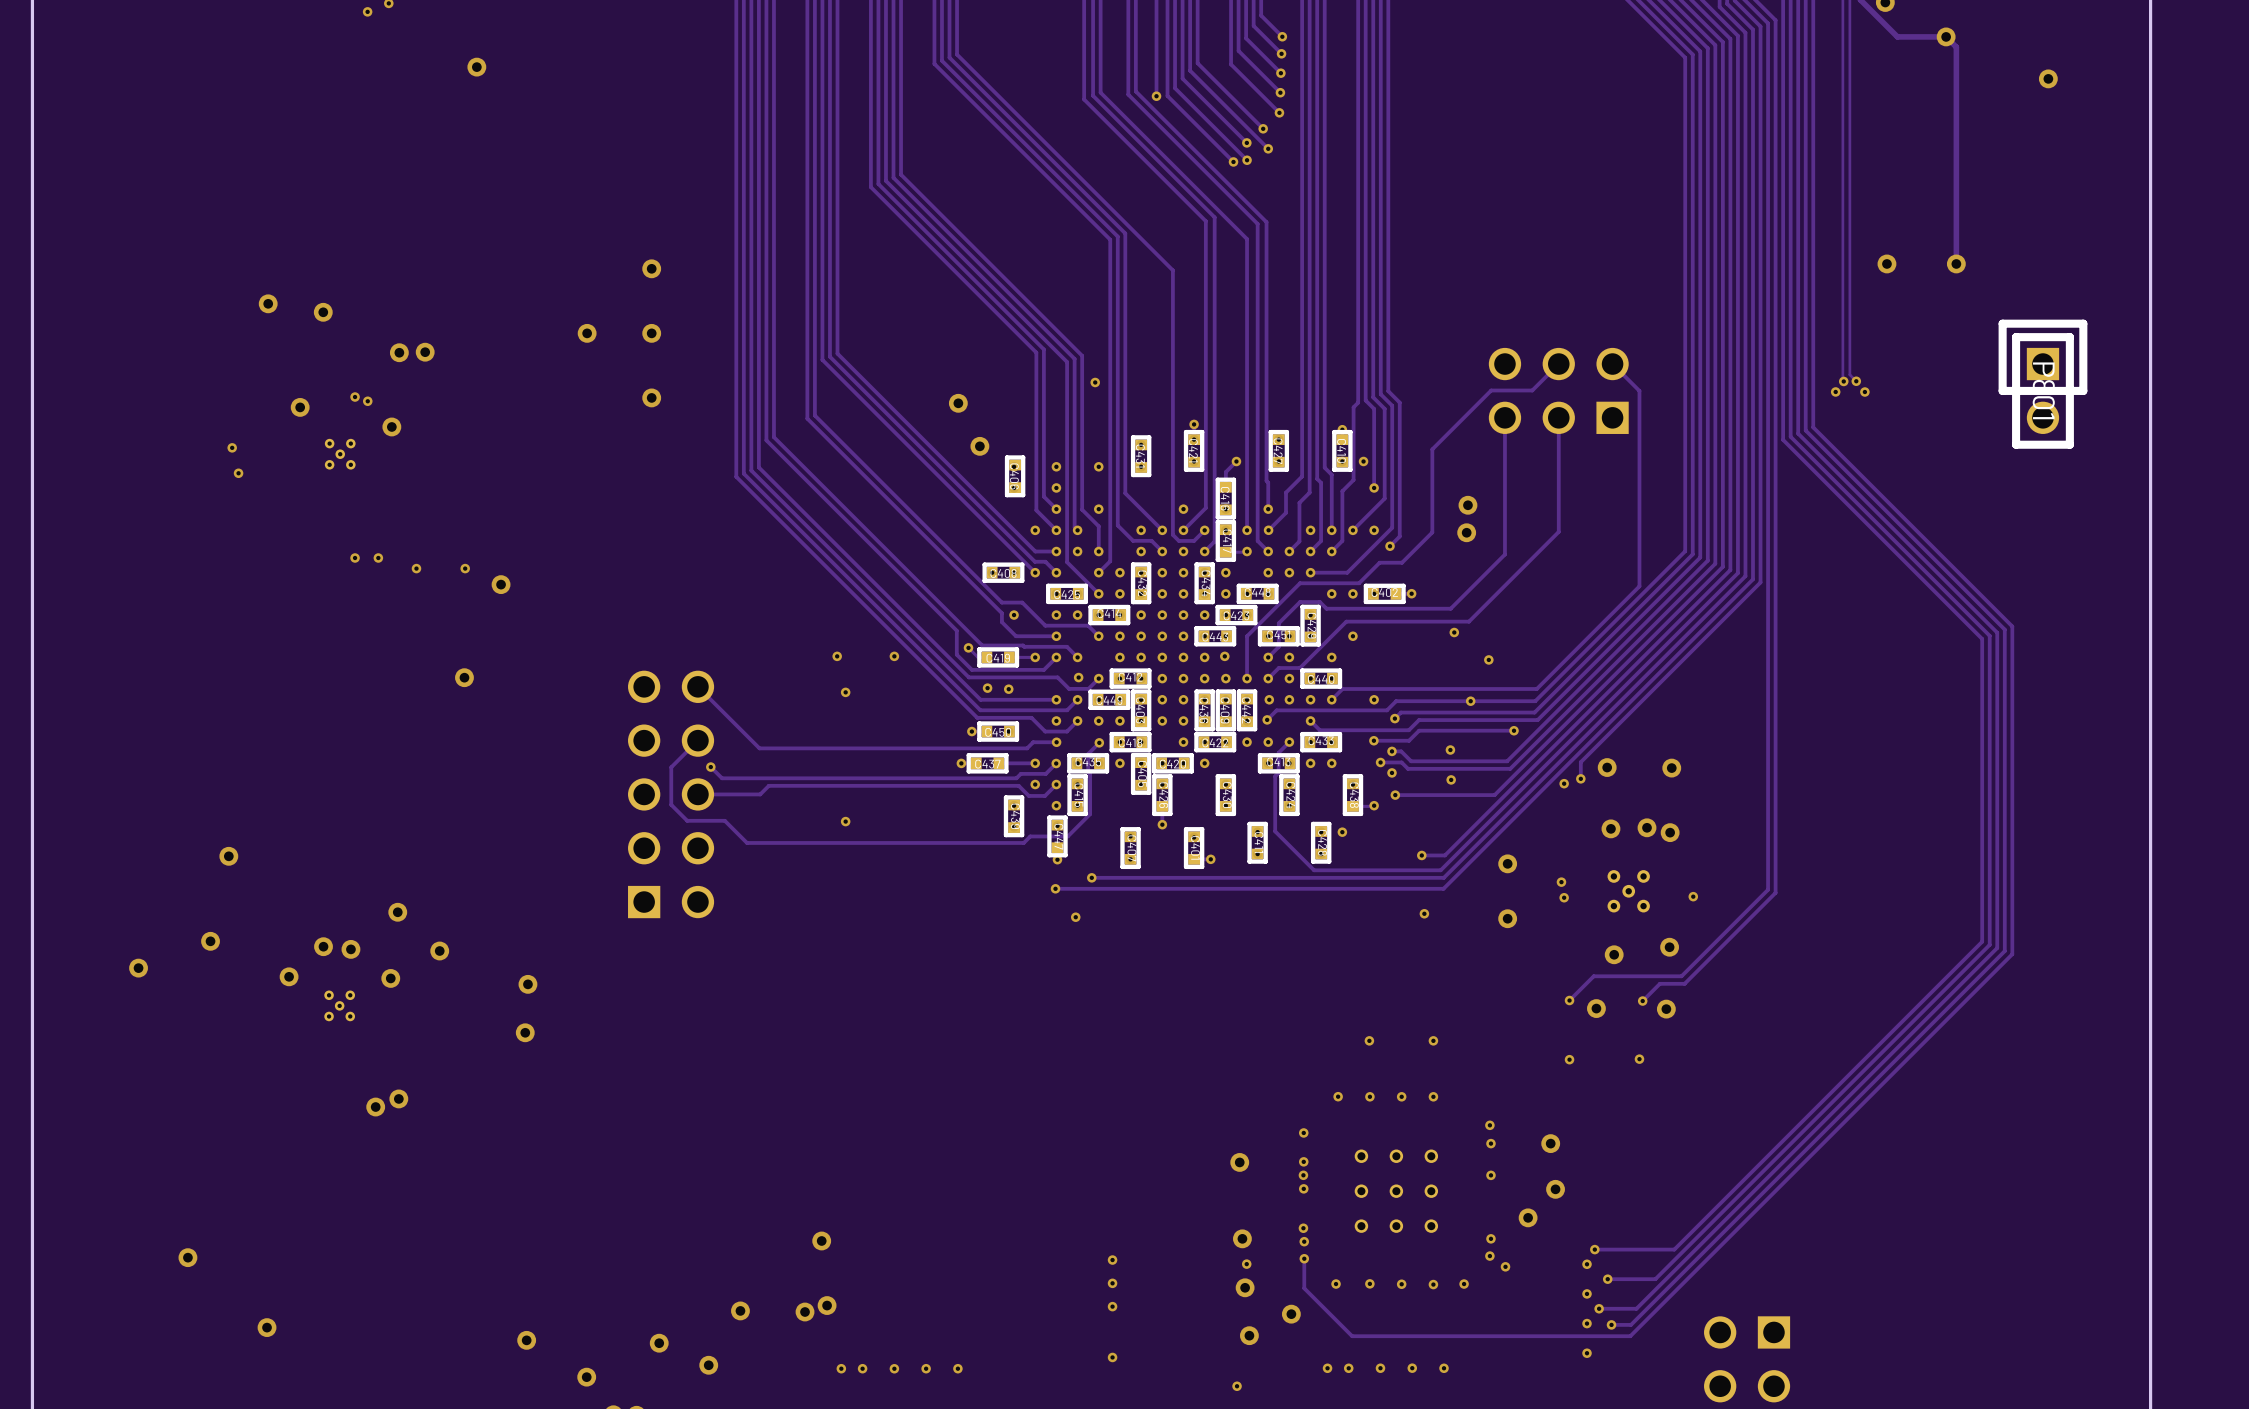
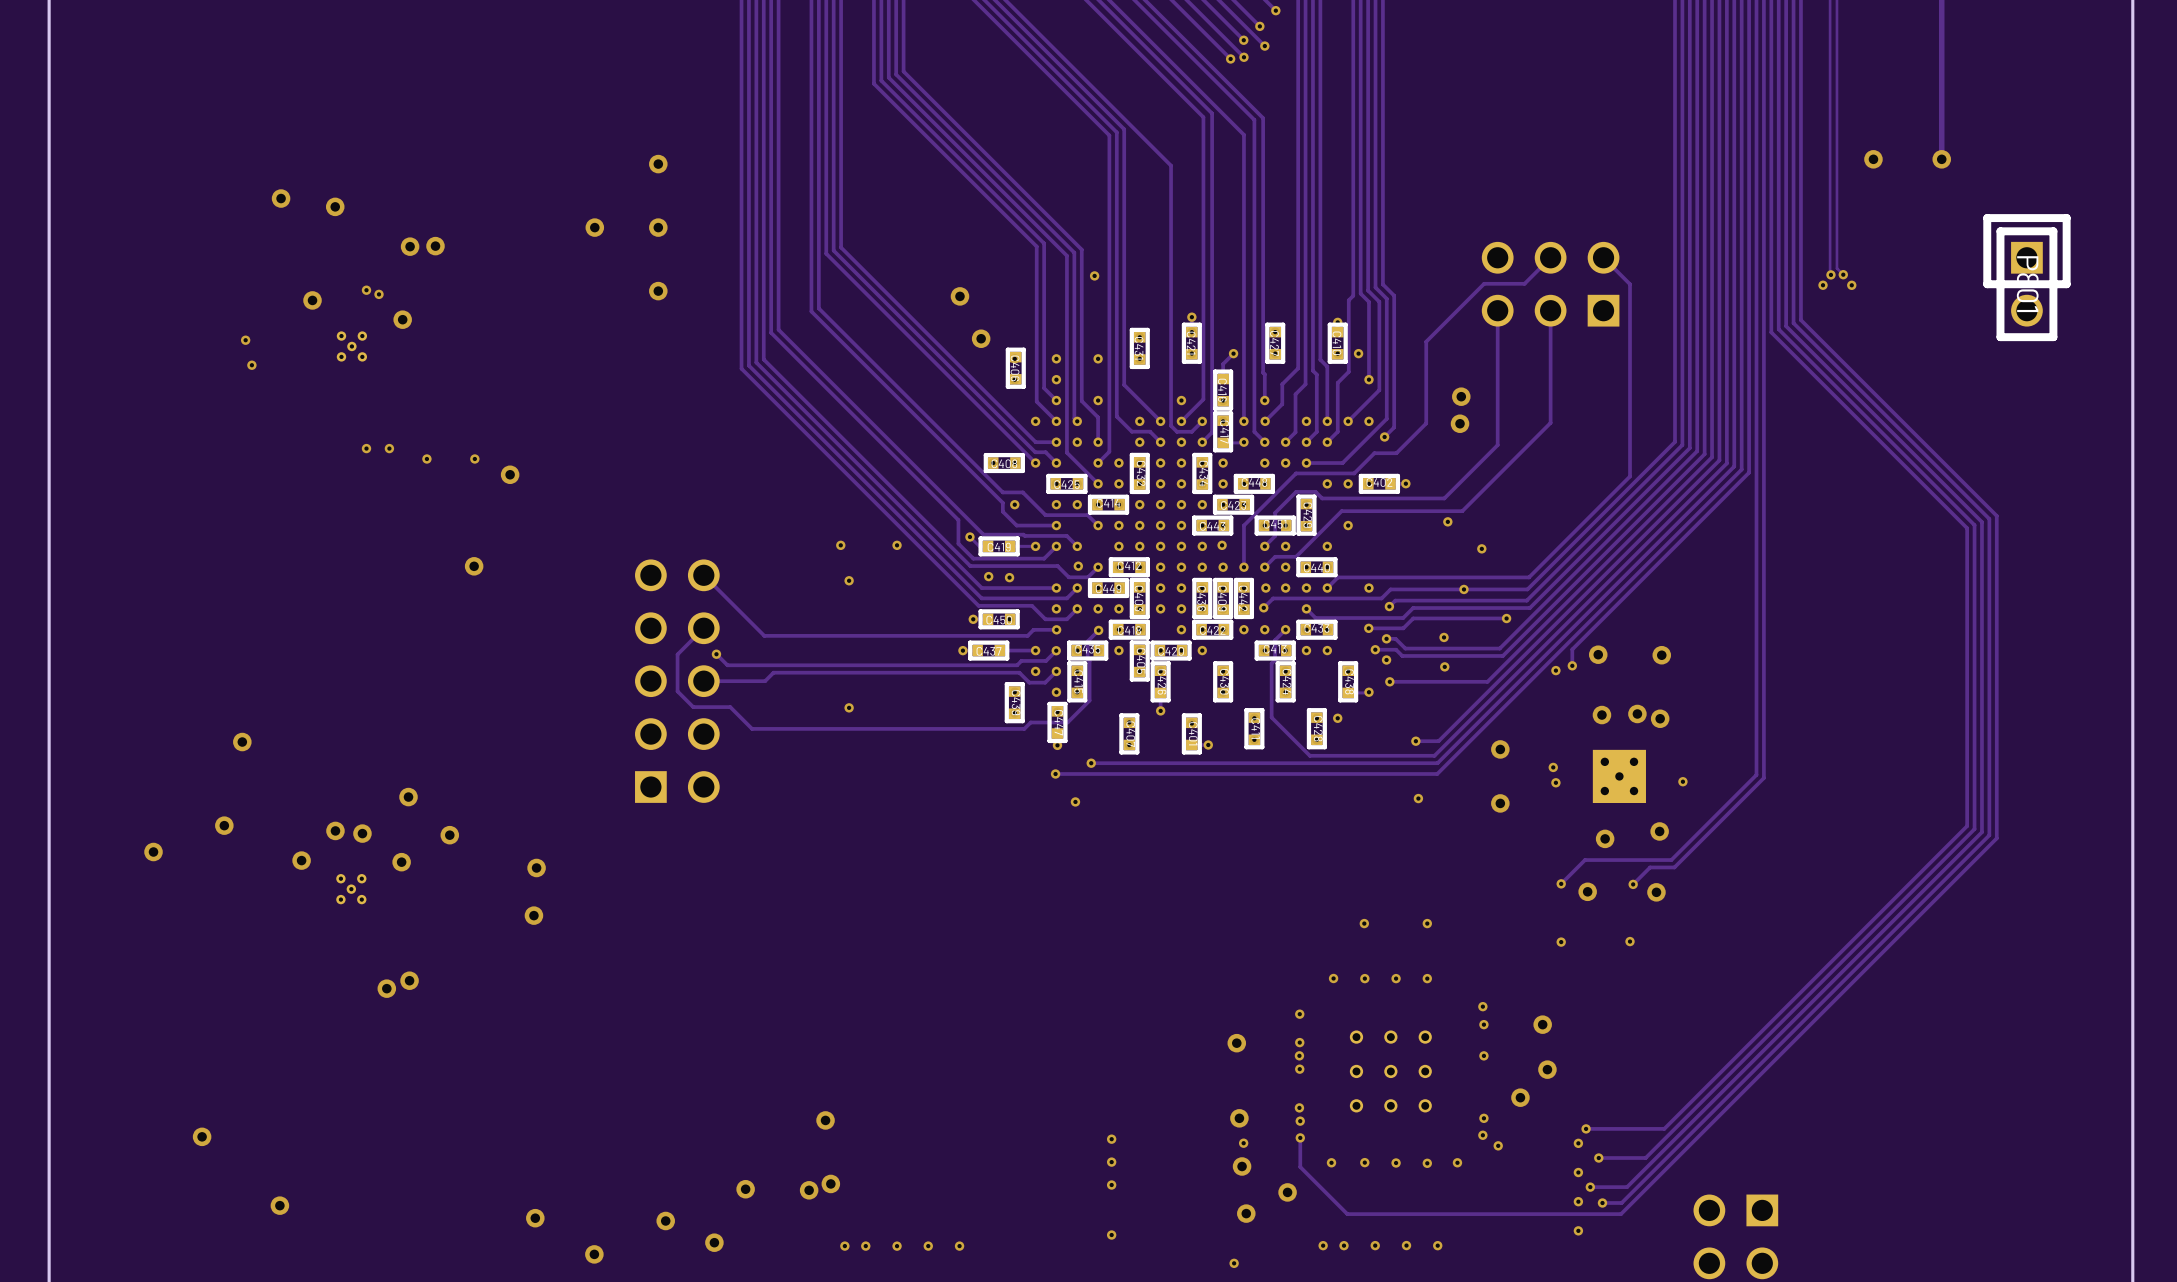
part footprint: [1607, 870, 1650, 913] -> [1592, 749, 1646, 803]

